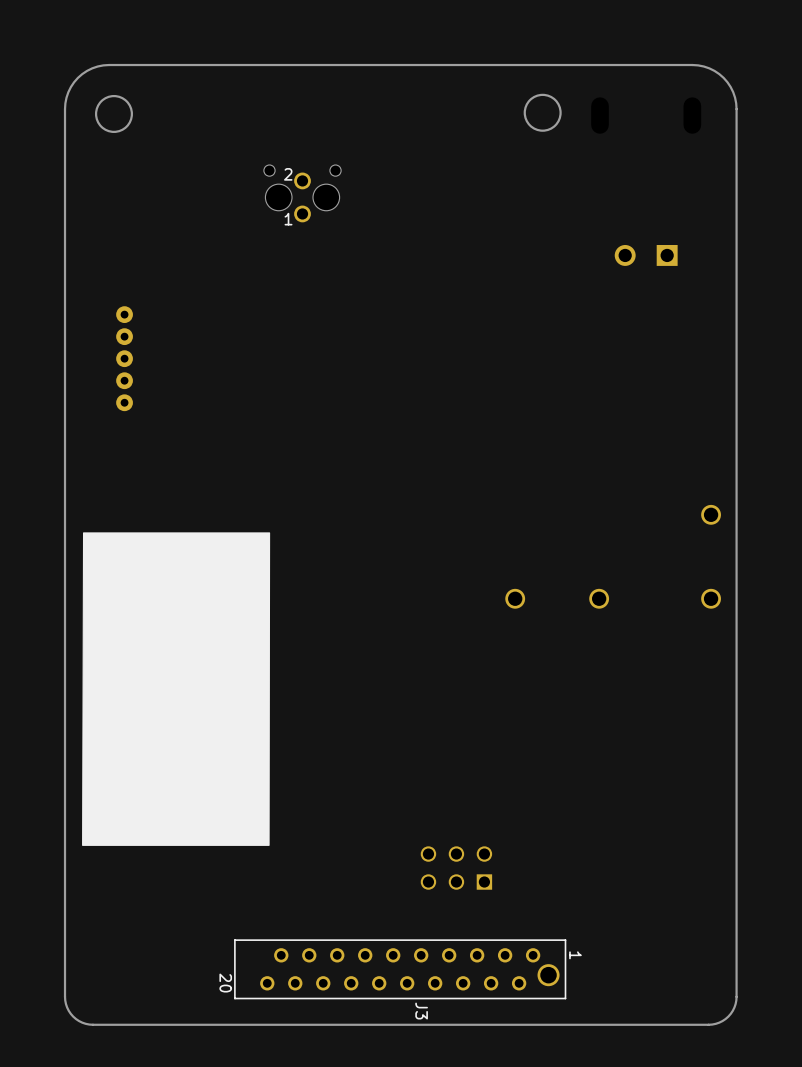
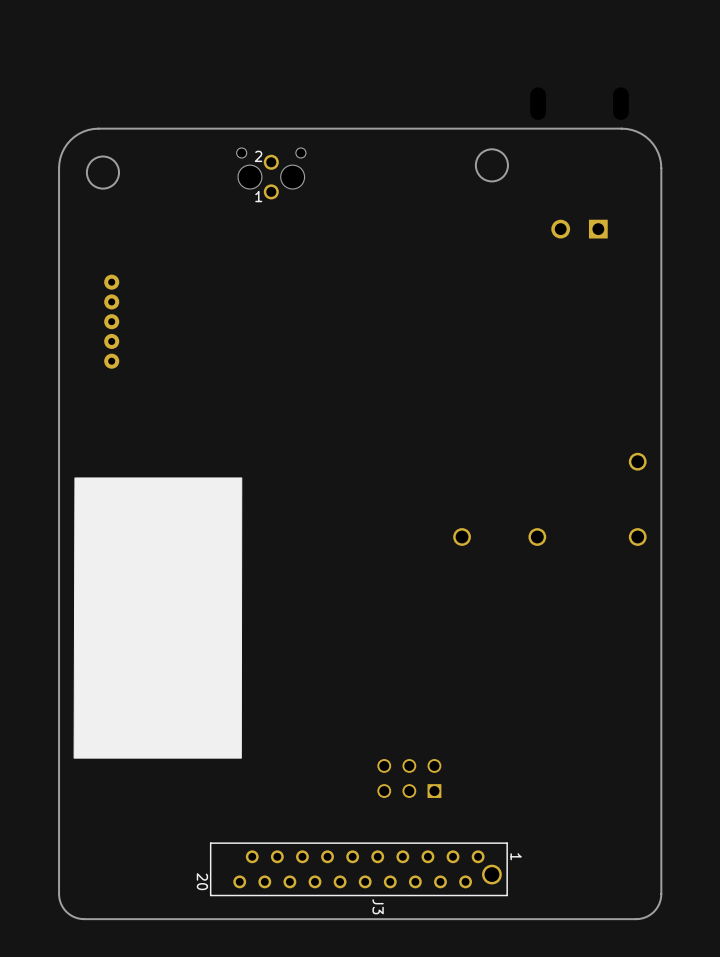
round board edge position: (542, 112) -> (491, 165)
round board edge position: (113, 113) -> (102, 172)
board edge: (708, 1024) (719, 1022) (728, 1016) (734, 1007) (736, 996) (736, 109) (735, 97) (730, 87) (723, 77) (714, 70) (703, 66) (692, 65) (109, 65) (92, 68) (77, 77) (68, 92) (65, 109) (65, 996) (67, 1007) (73, 1016) (82, 1022) (93, 1024) -> (635, 919) (645, 917) (653, 911) (659, 903) (661, 894) (661, 168) (658, 153) (653, 144) (636, 131) (621, 128) (98, 128) (83, 131) (70, 140) (62, 153) (59, 168) (59, 894) (60, 903) (66, 911) (74, 917) (84, 919)

